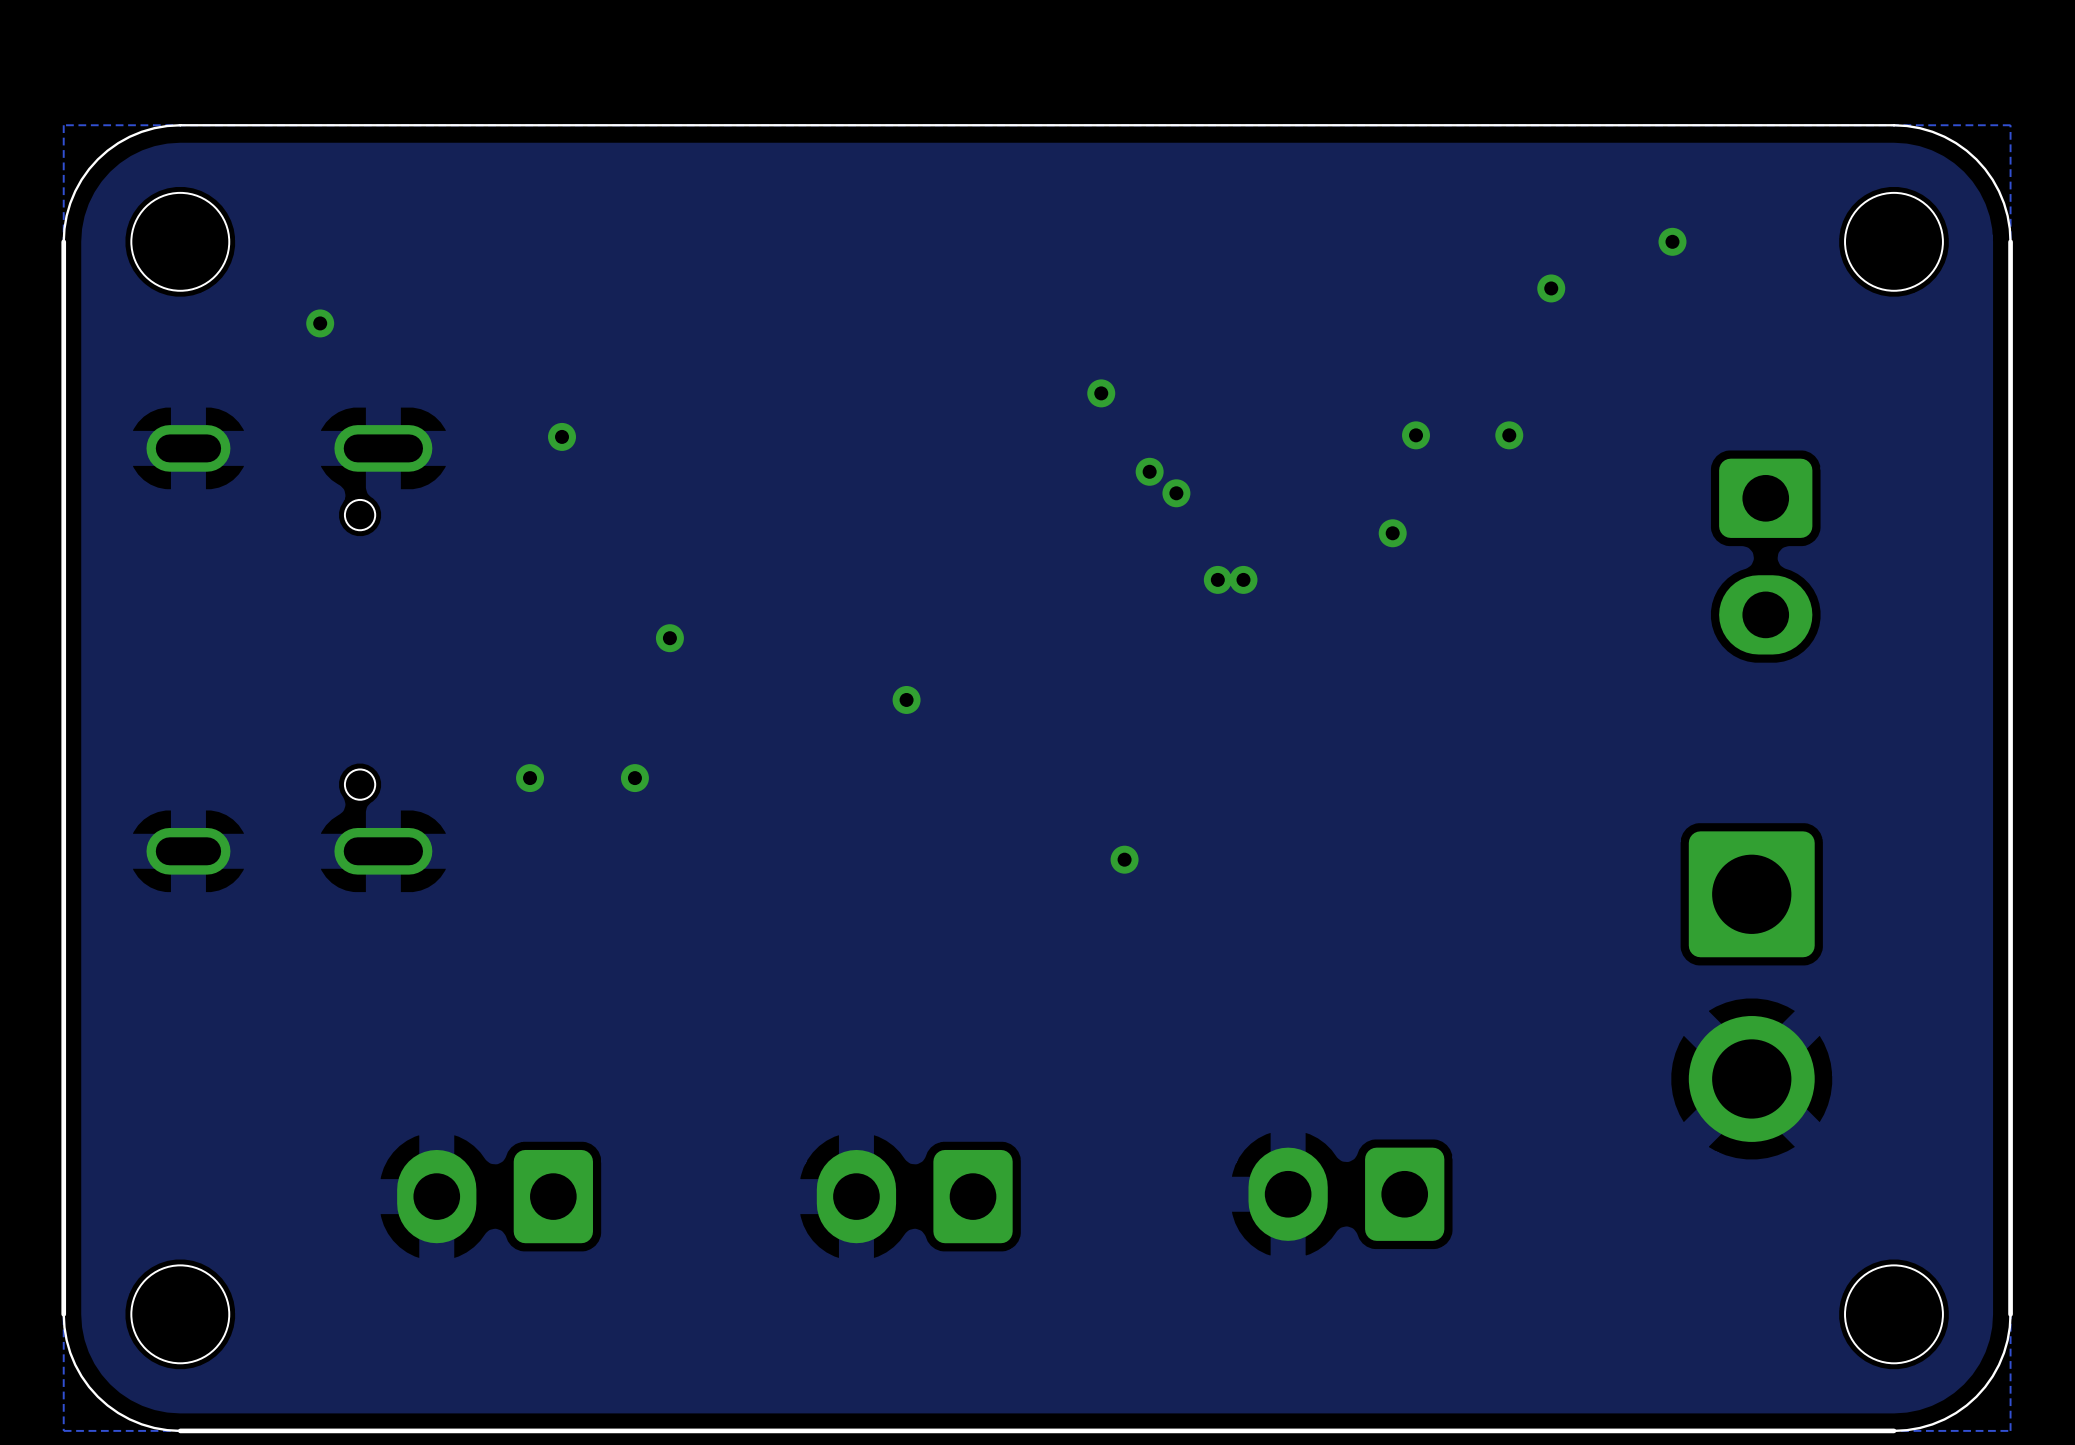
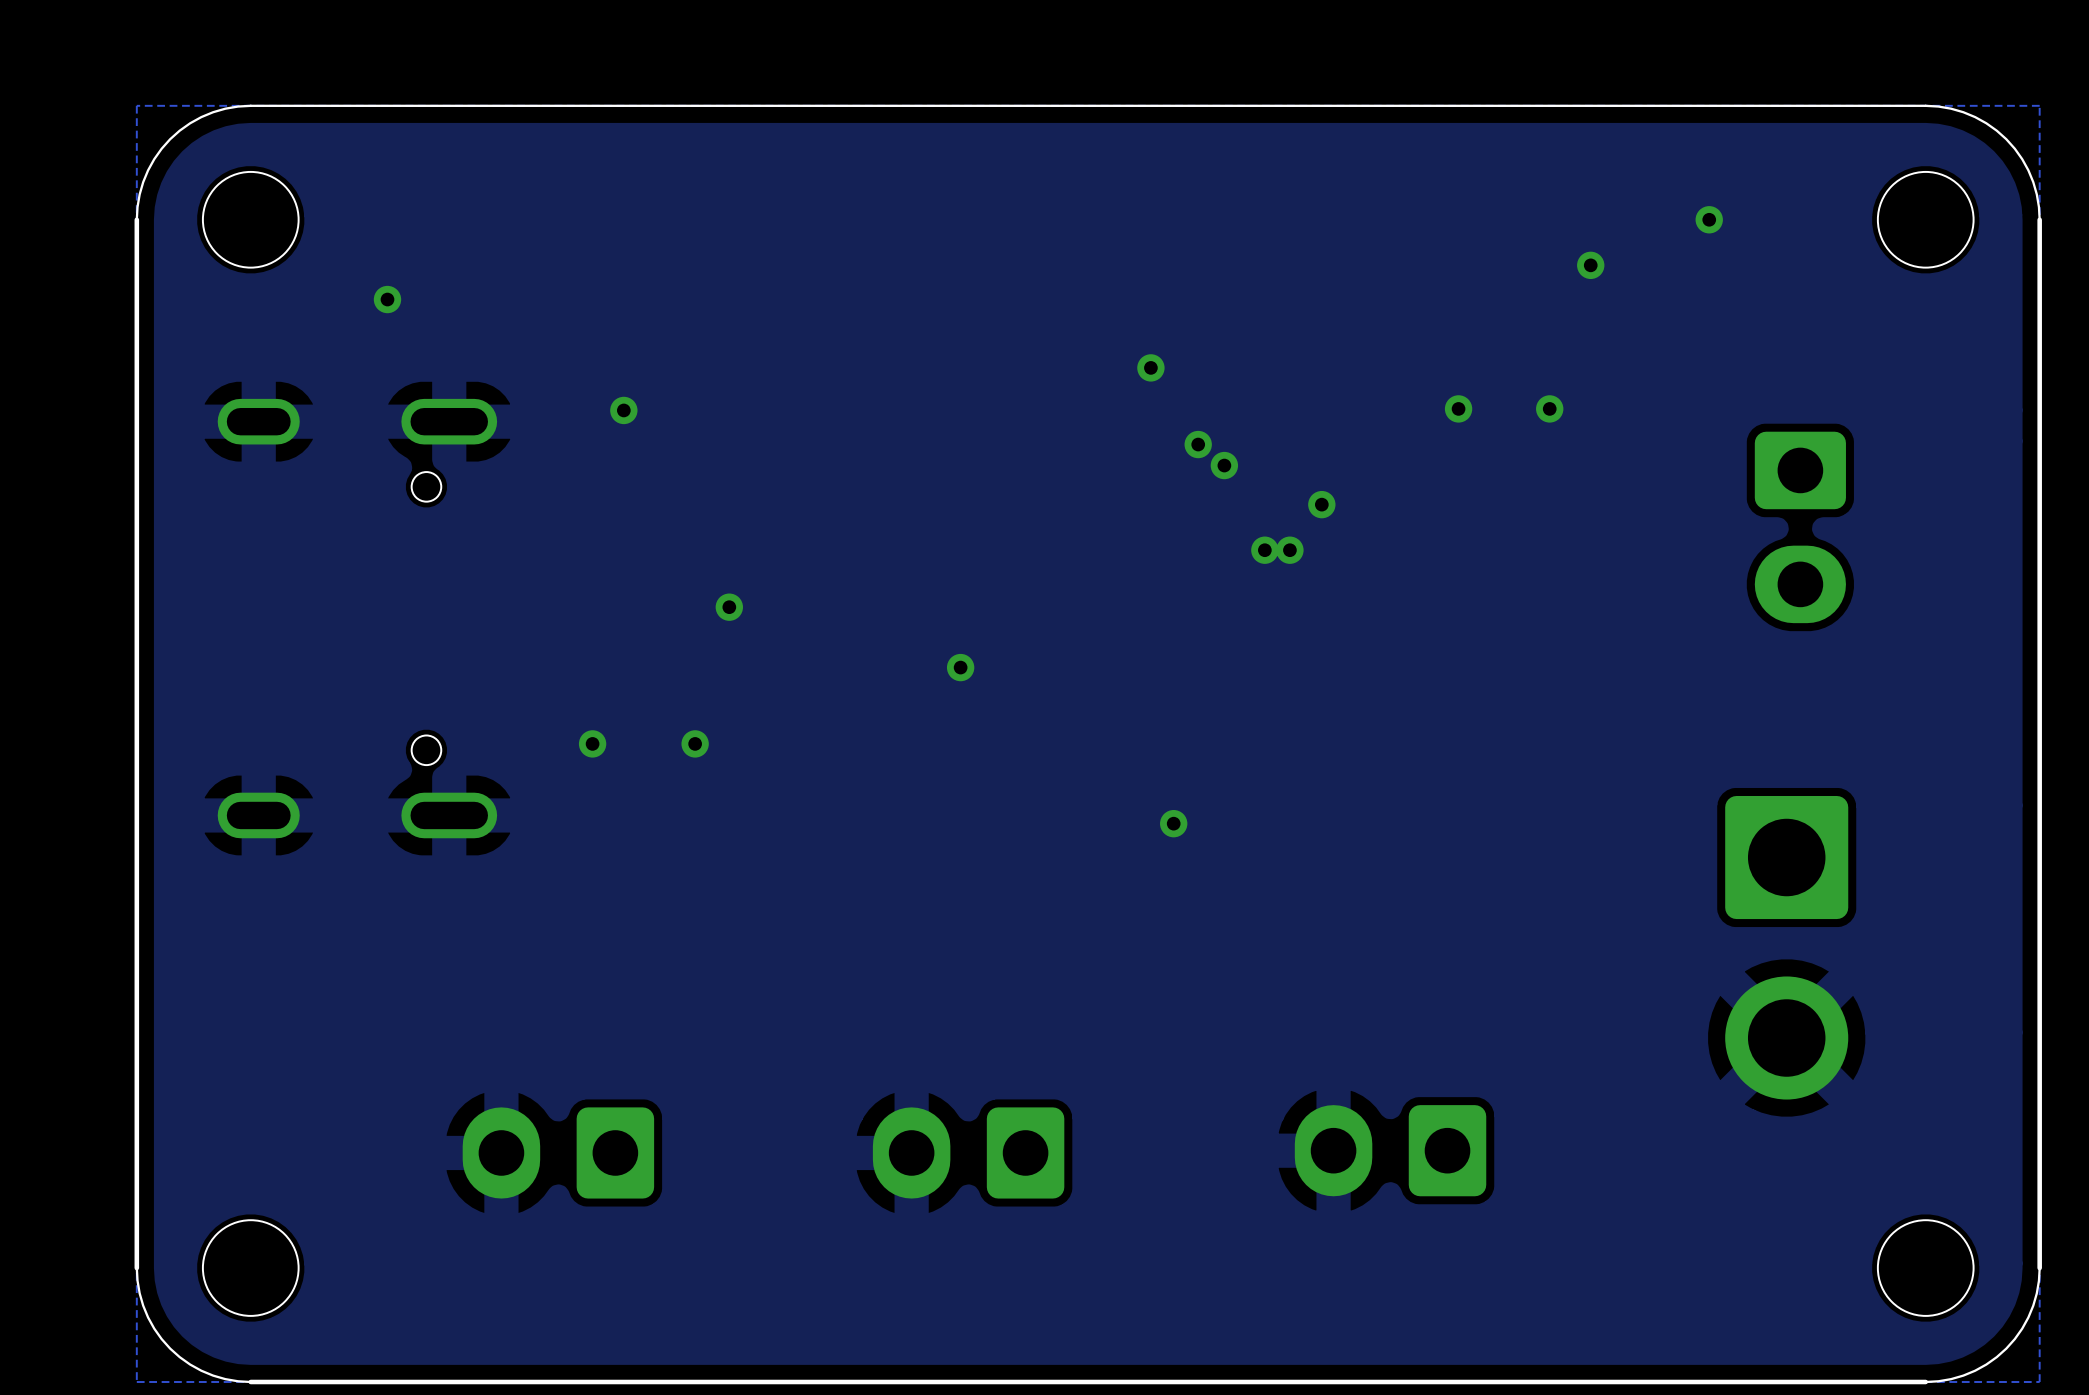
via position: (1392, 533) -> (1321, 504)

